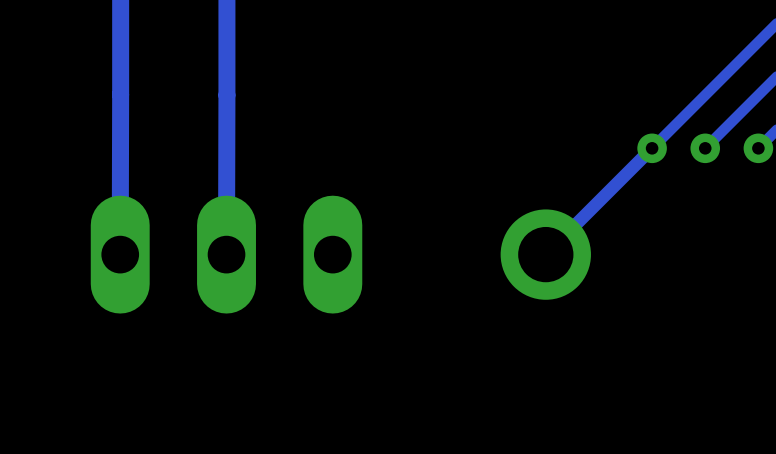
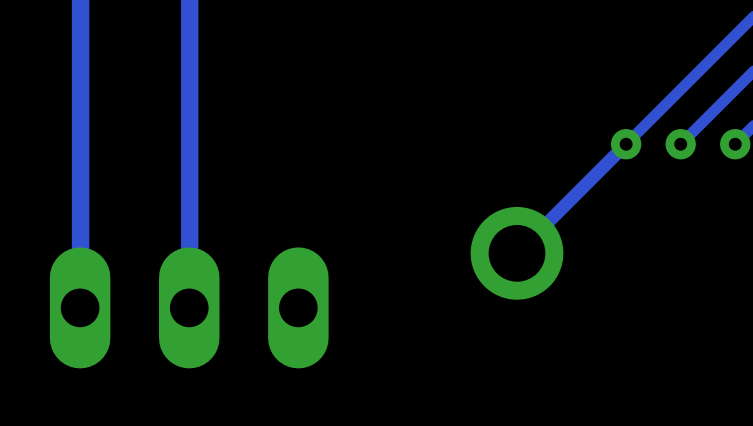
track: (120, 94) (120, 254) -> (80, 89) (80, 307)
track: (226, 95) (226, 254) -> (189, 89) (189, 307)
part position: (226, 254) -> (189, 307)

